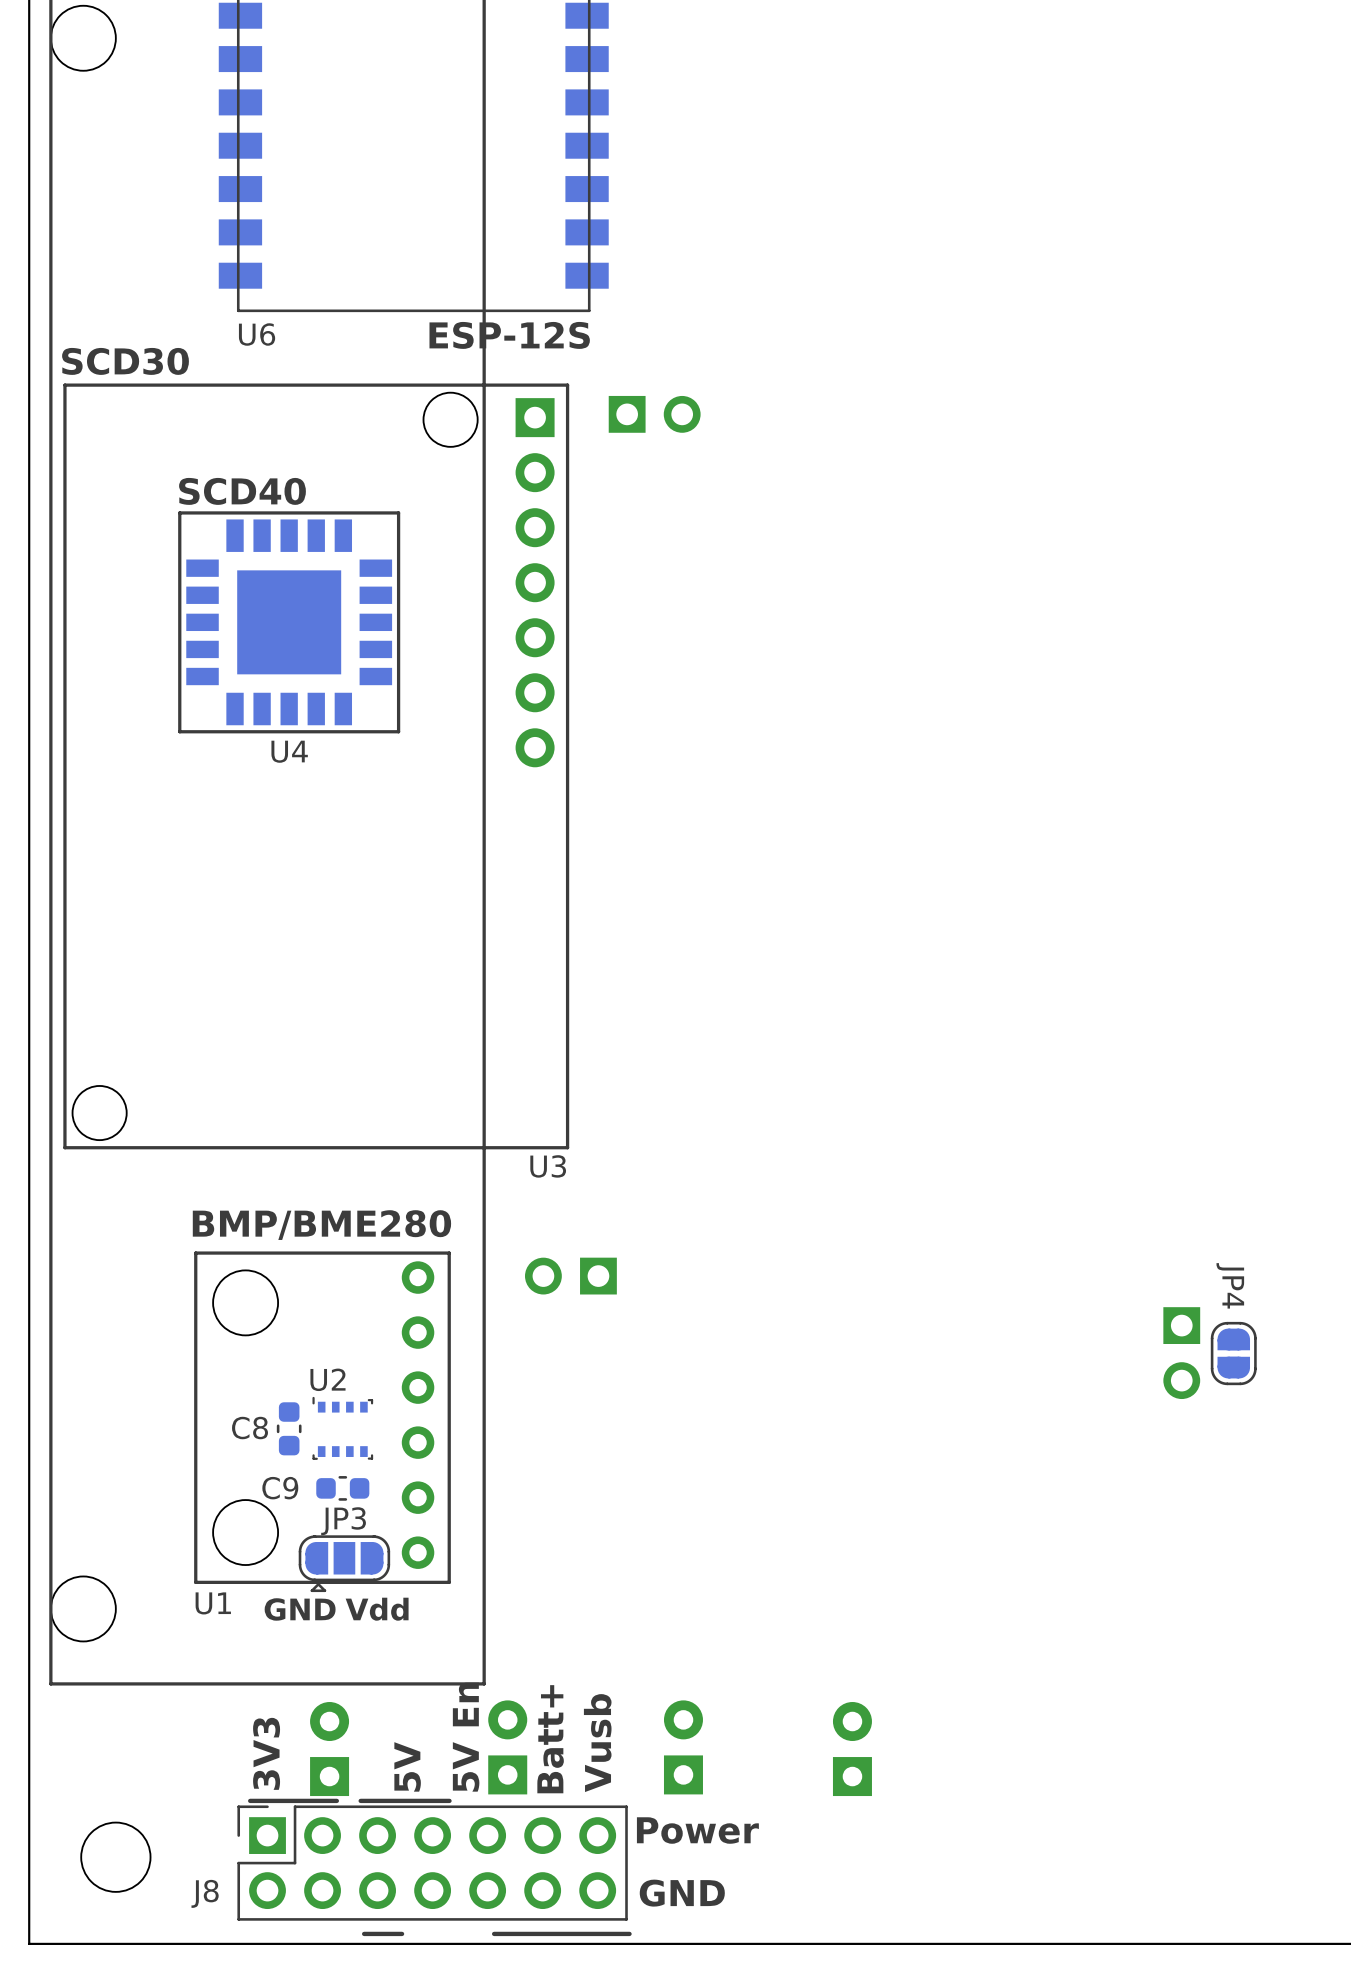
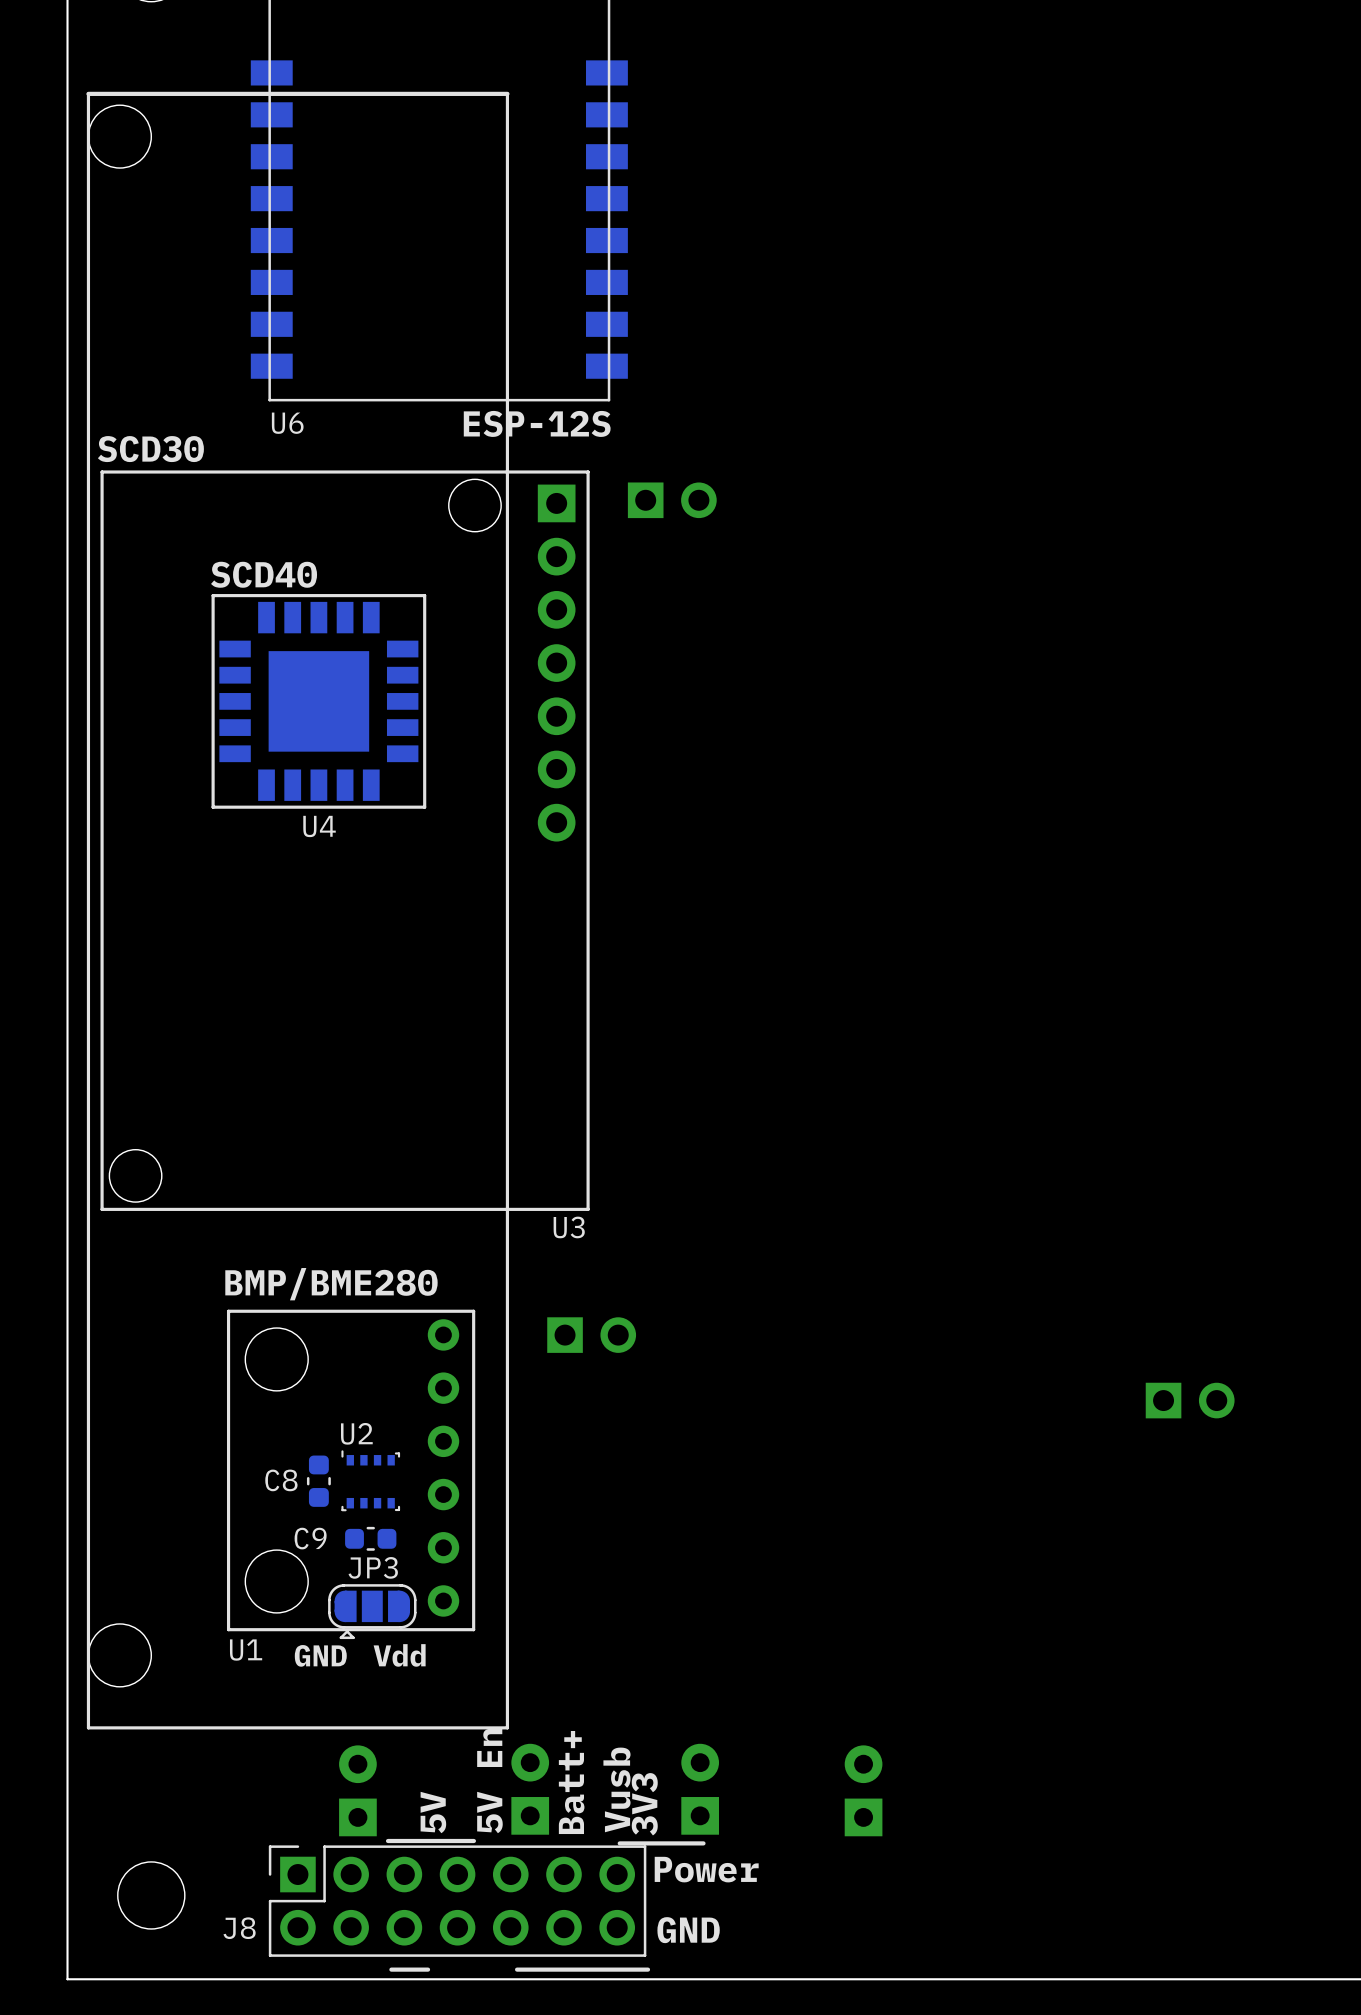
part rotation: 0° (570, 1276) -> 180° (591, 1335)
part rotation: 0° (1181, 1353) -> 90° counterclockwise (1190, 1400)
JP4: (1233, 1353) -> none
text position: 3V3 (266, 1753) -> 3V3 (644, 1804)
line: (336, 1800) (250, 1800) -> (703, 1843) (619, 1843)

